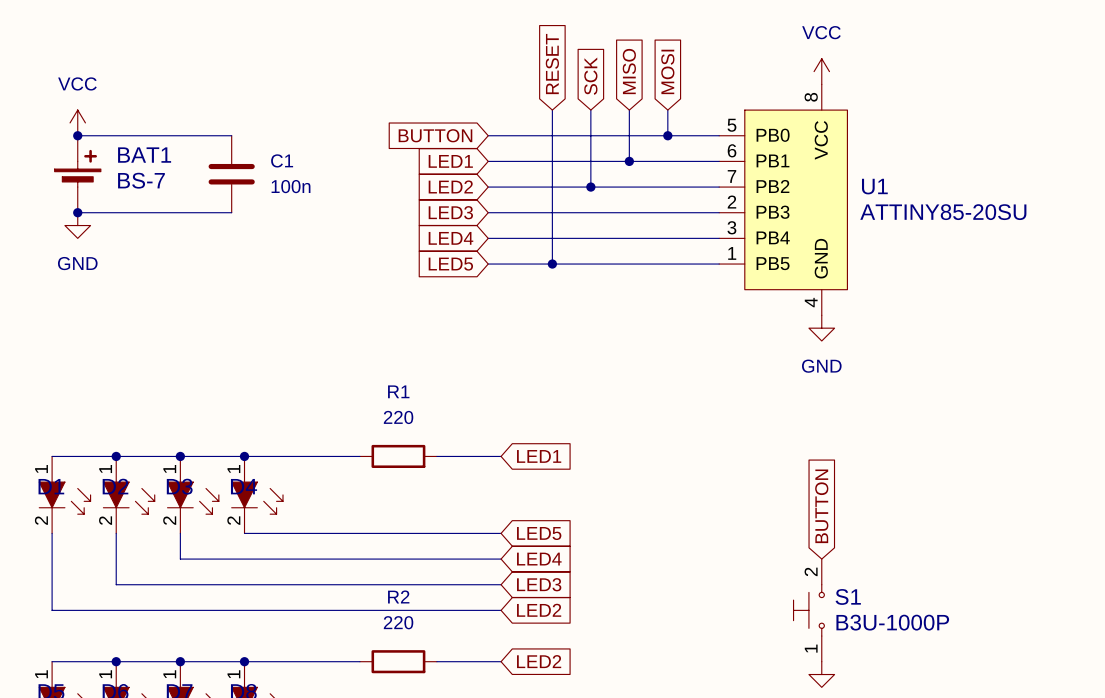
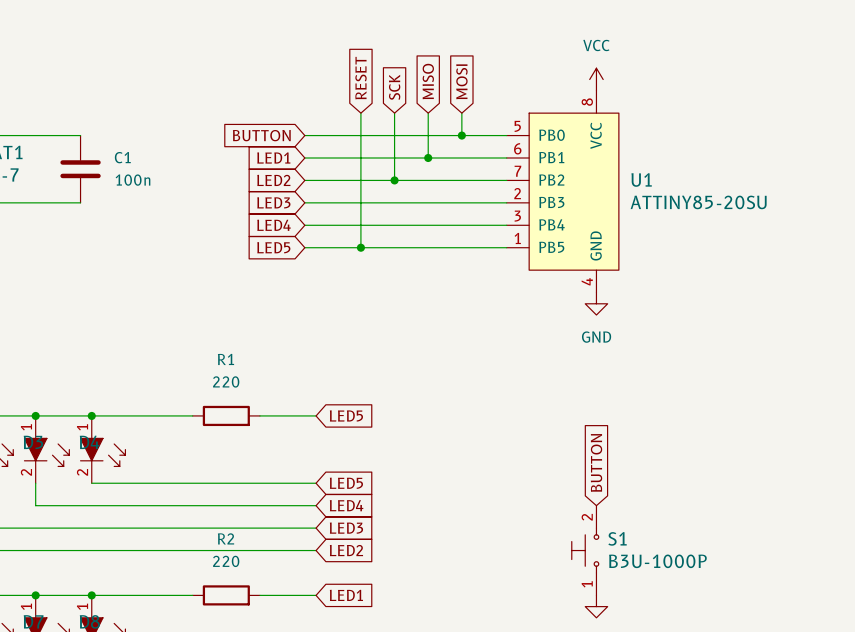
global label: LED1 (539, 456) -> LED5 (346, 415)
global label: LED2 (539, 661) -> LED1 (346, 595)

